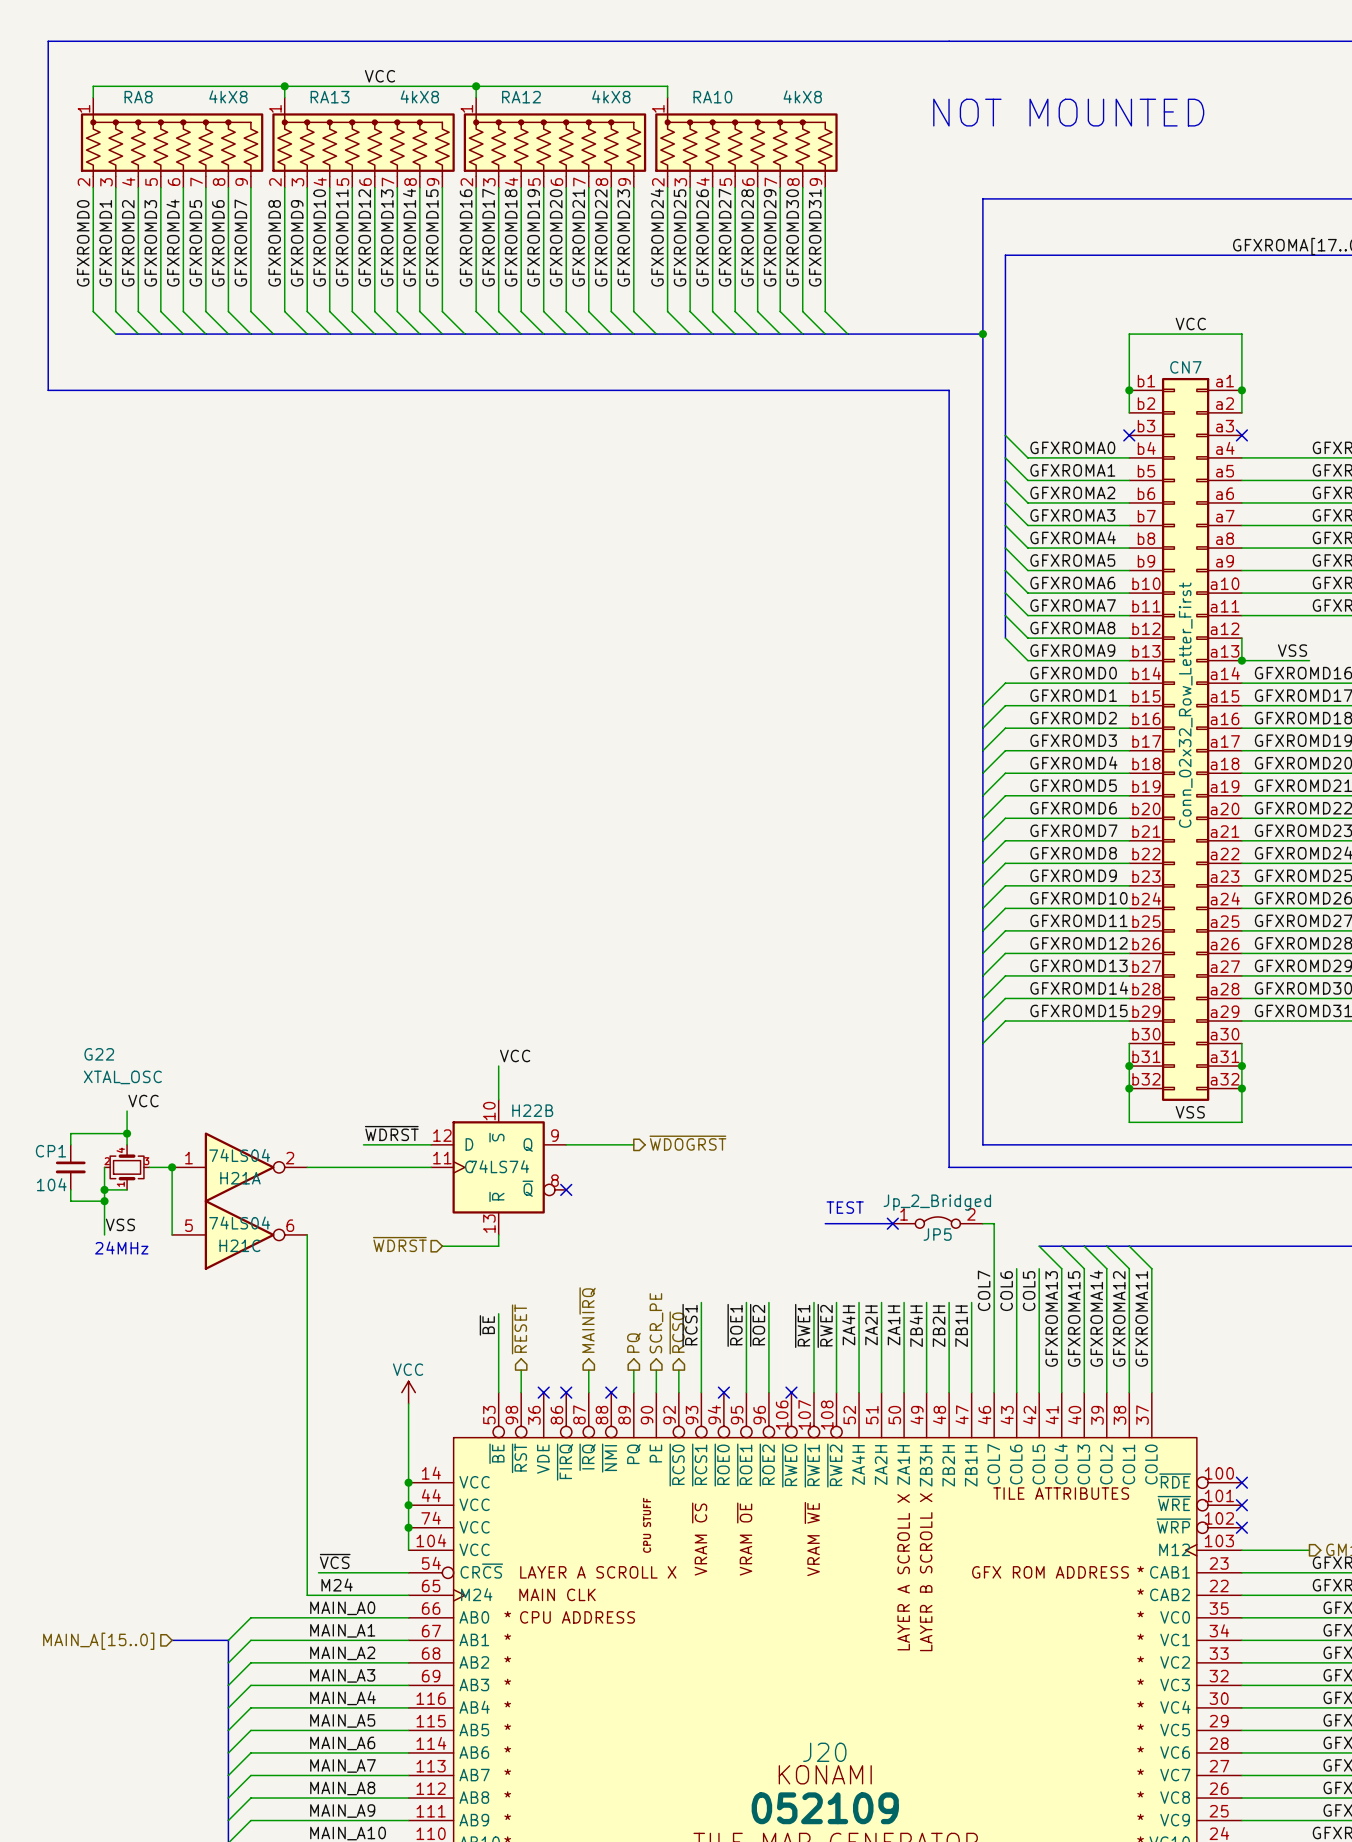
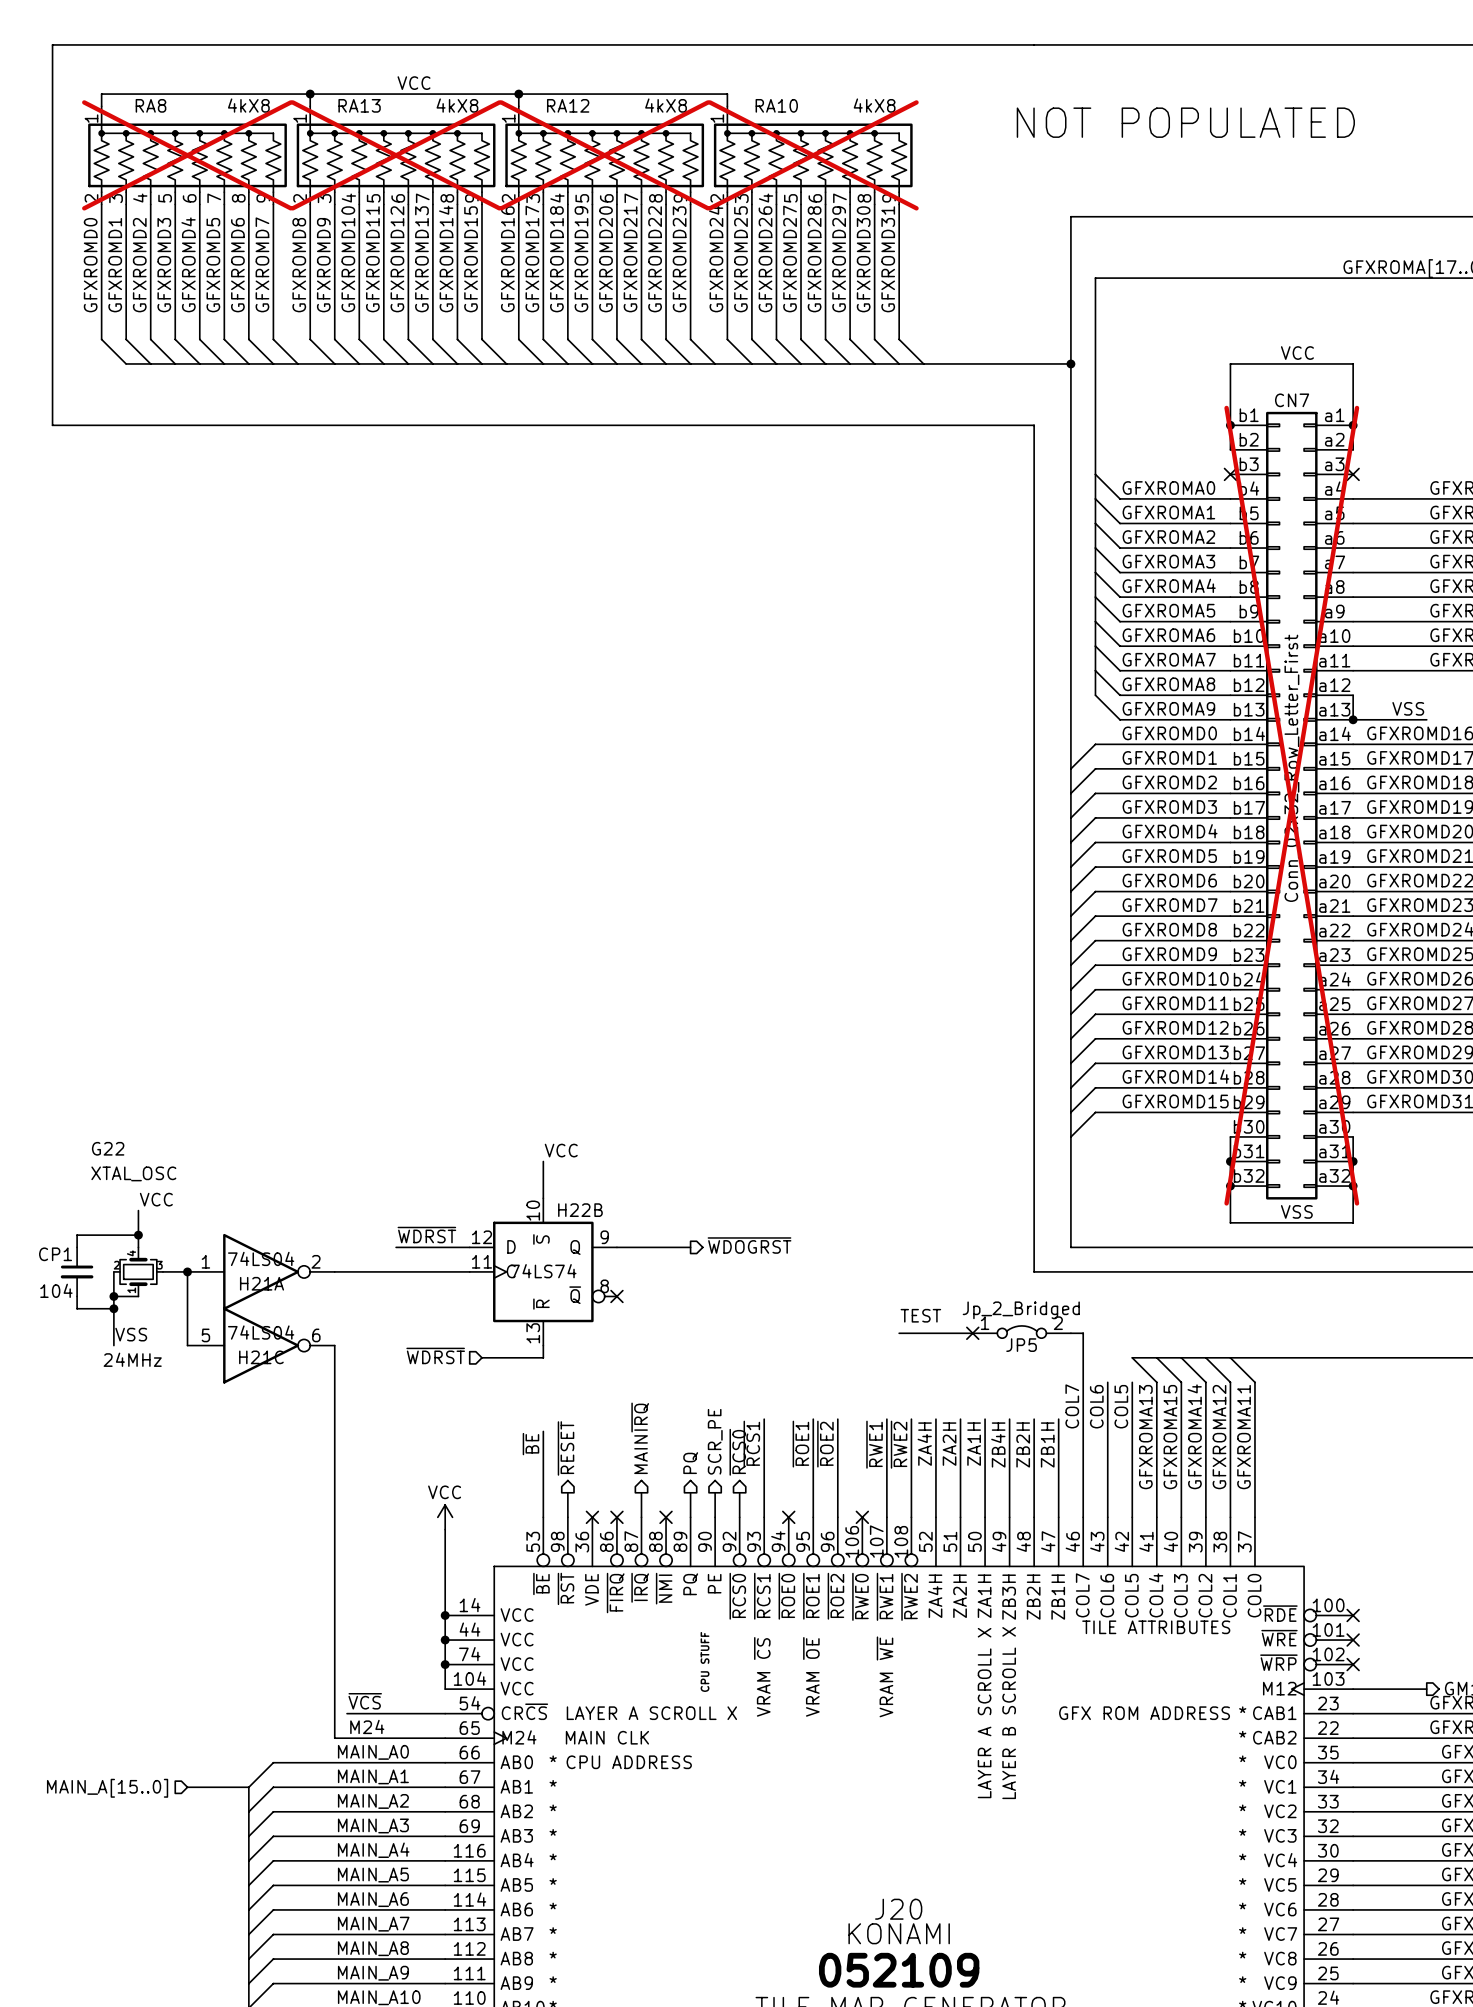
text: NOT MOUNTED (1068, 112) -> NOT POPULATED (1185, 122)
RA8 do-not-place cross: none -> (187, 155)
RA13 do-not-place cross: none -> (396, 155)
RA12 do-not-place cross: none -> (604, 155)
RA10 do-not-place cross: none -> (813, 155)
CN7 do-not-place cross: none -> (1291, 805)

